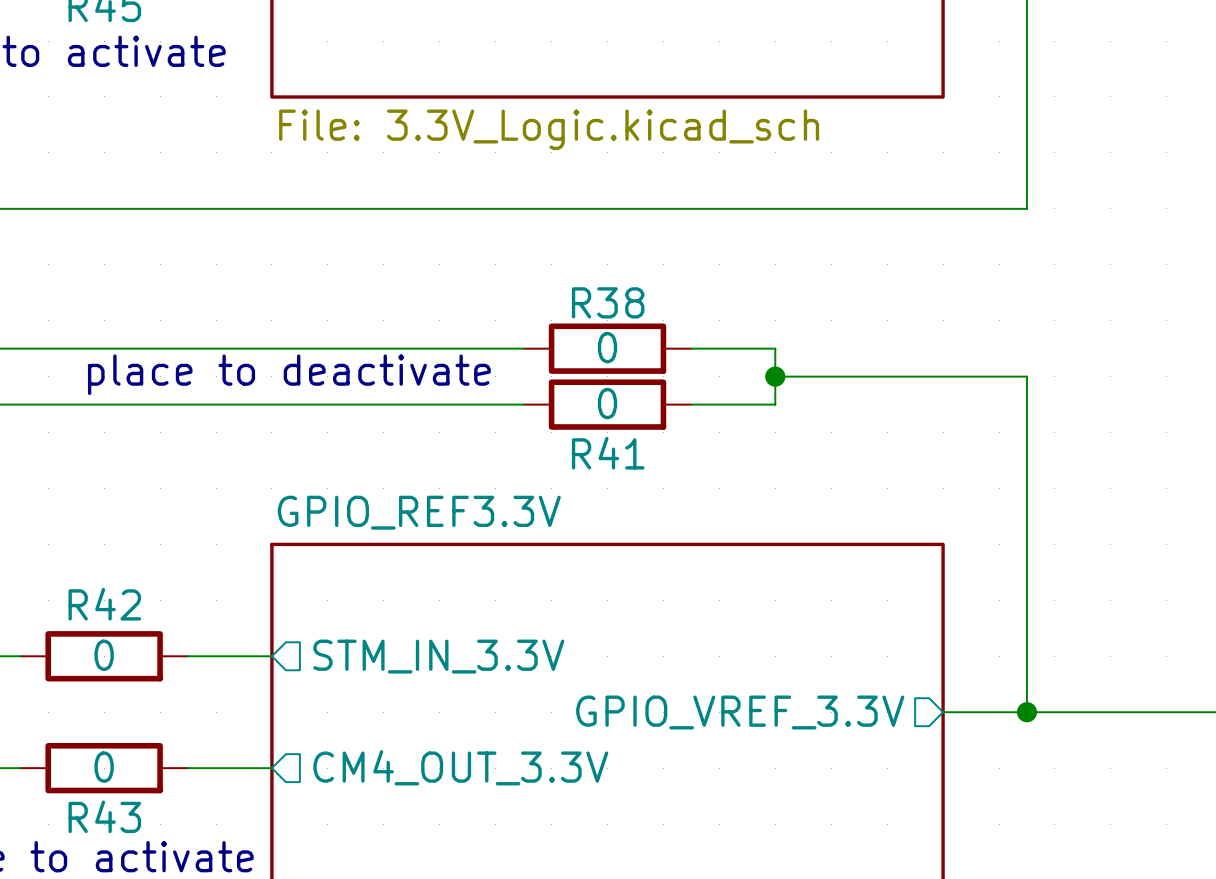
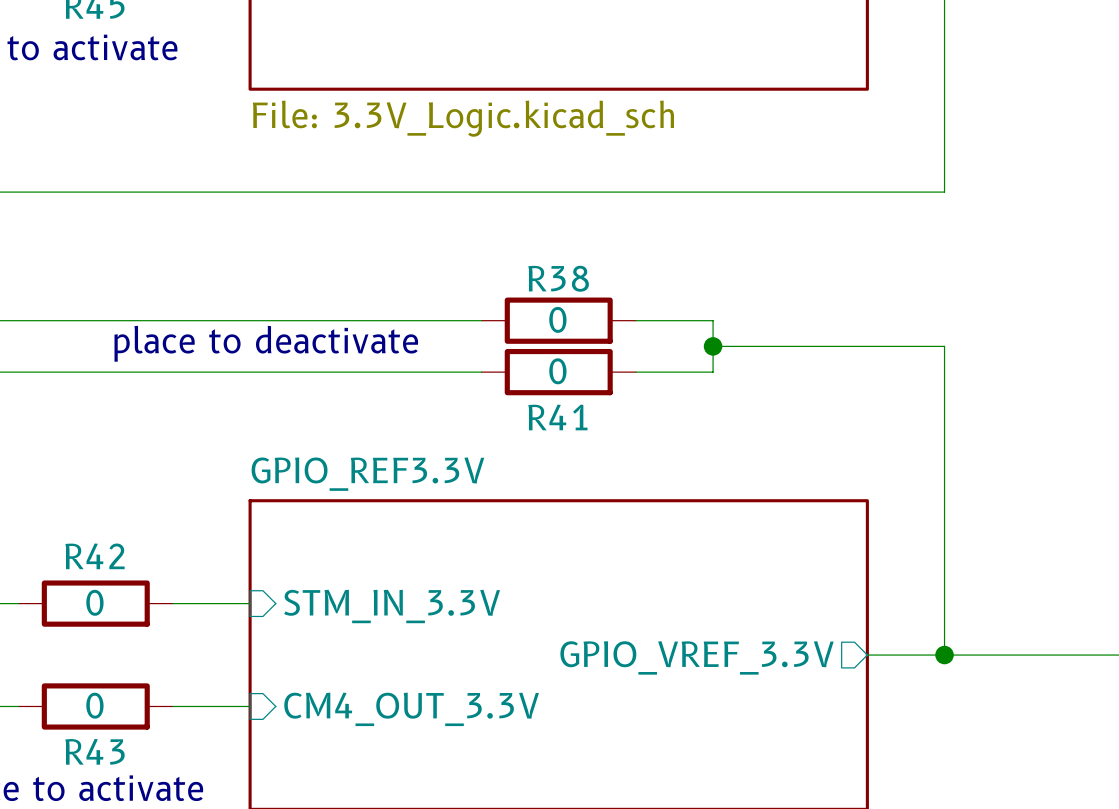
sheet pin shape: output (438, 656) -> input (392, 606)
sheet pin shape: output (460, 767) -> input (411, 709)

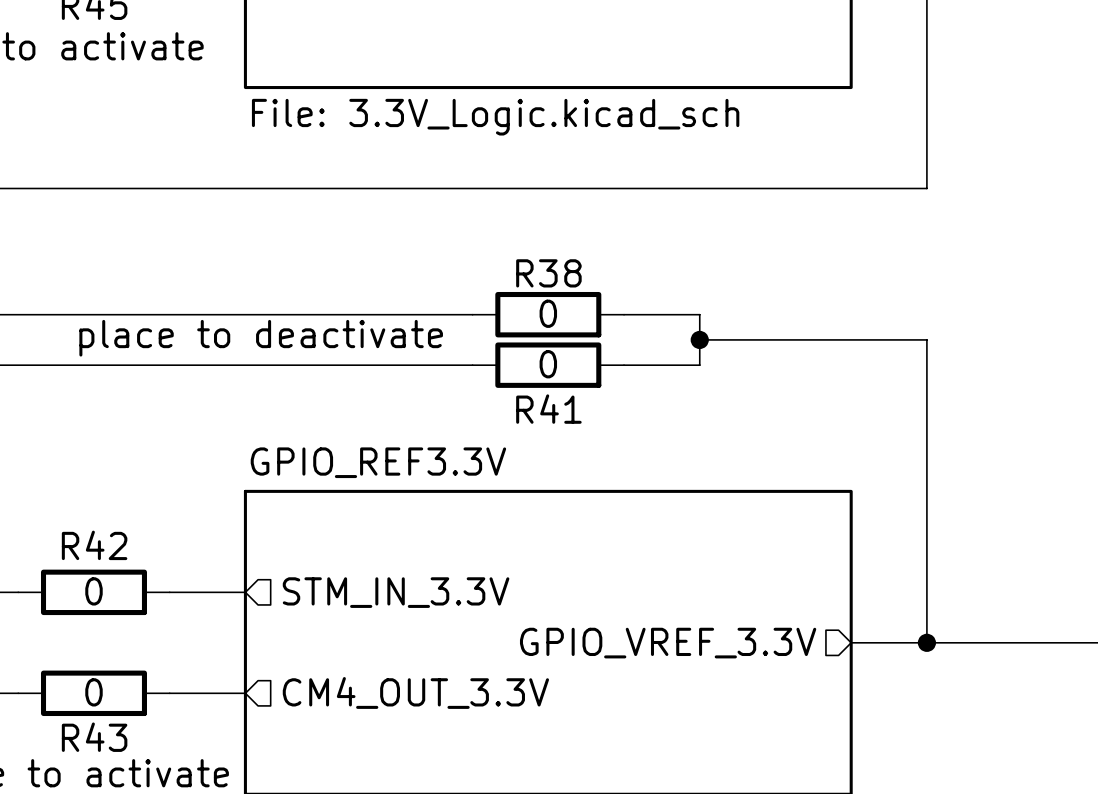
sheet pin shape: input (392, 606) -> output (396, 592)
sheet pin shape: input (411, 709) -> output (415, 692)

